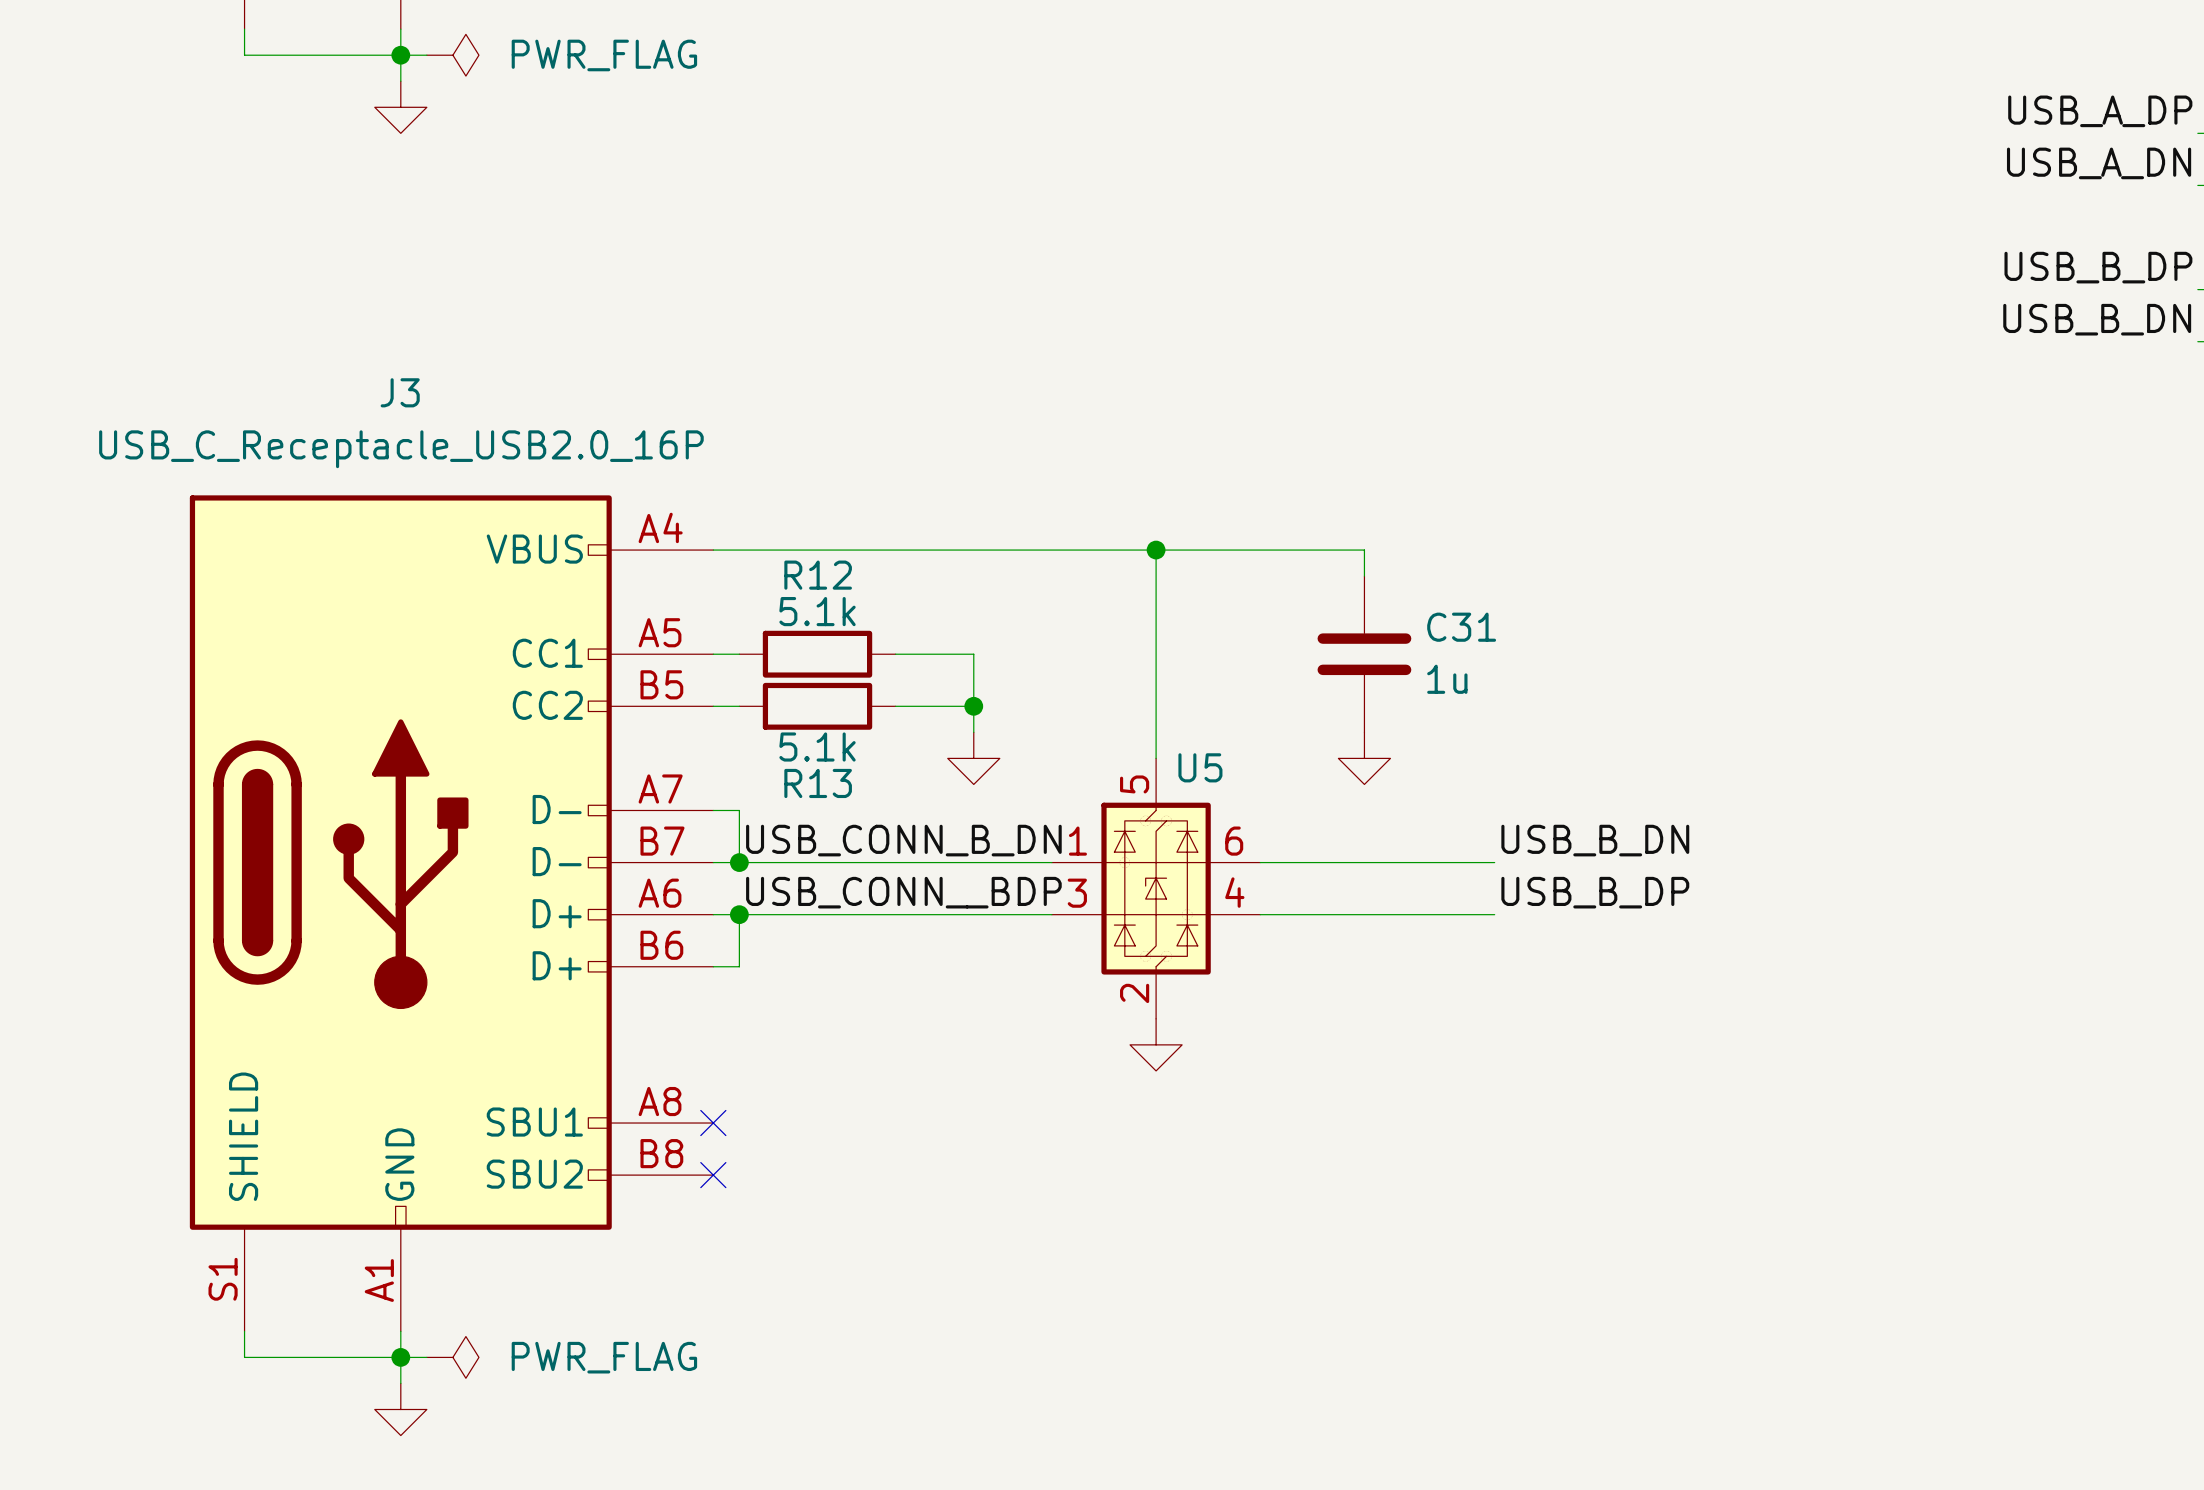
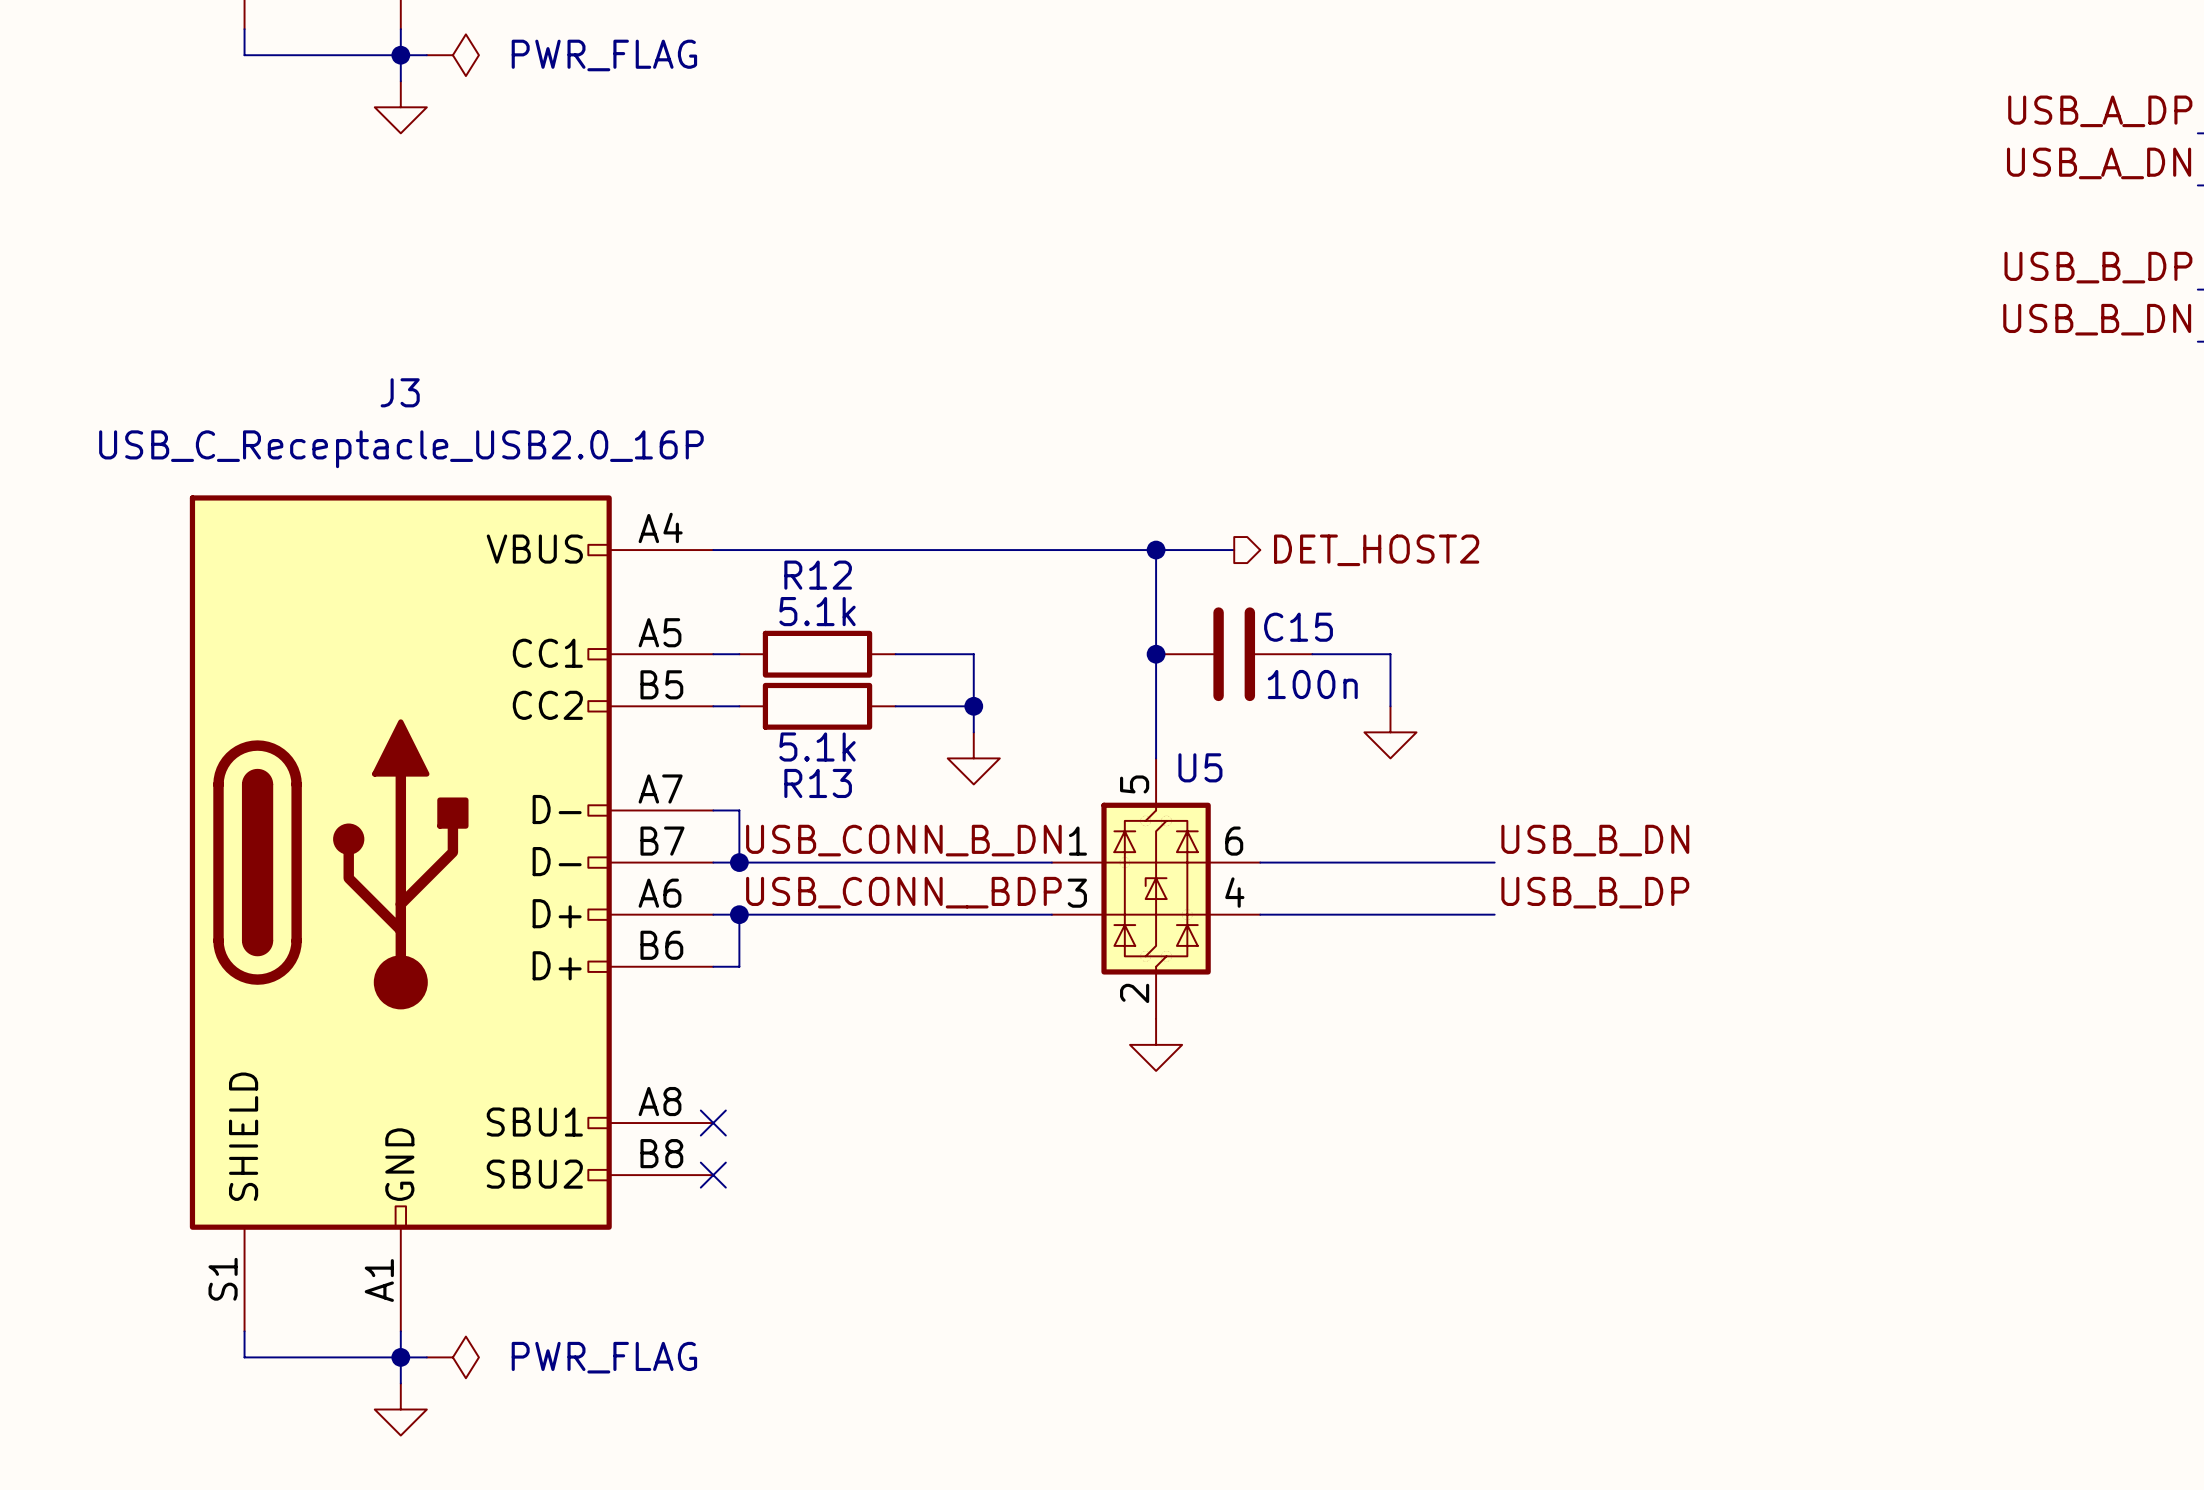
wire: (1234, 550) (1364, 550) (1364, 576) -> none
hierarchical label: none -> DET_HOST2 (1376, 550)
junction: none -> (1156, 654)
C15: none -> 100n (1234, 654)
wire: none -> (1312, 654) (1390, 654) (1390, 706)
C31: 1u (1364, 654) -> none
power symbol position: (1364, 758) -> (1390, 732)

